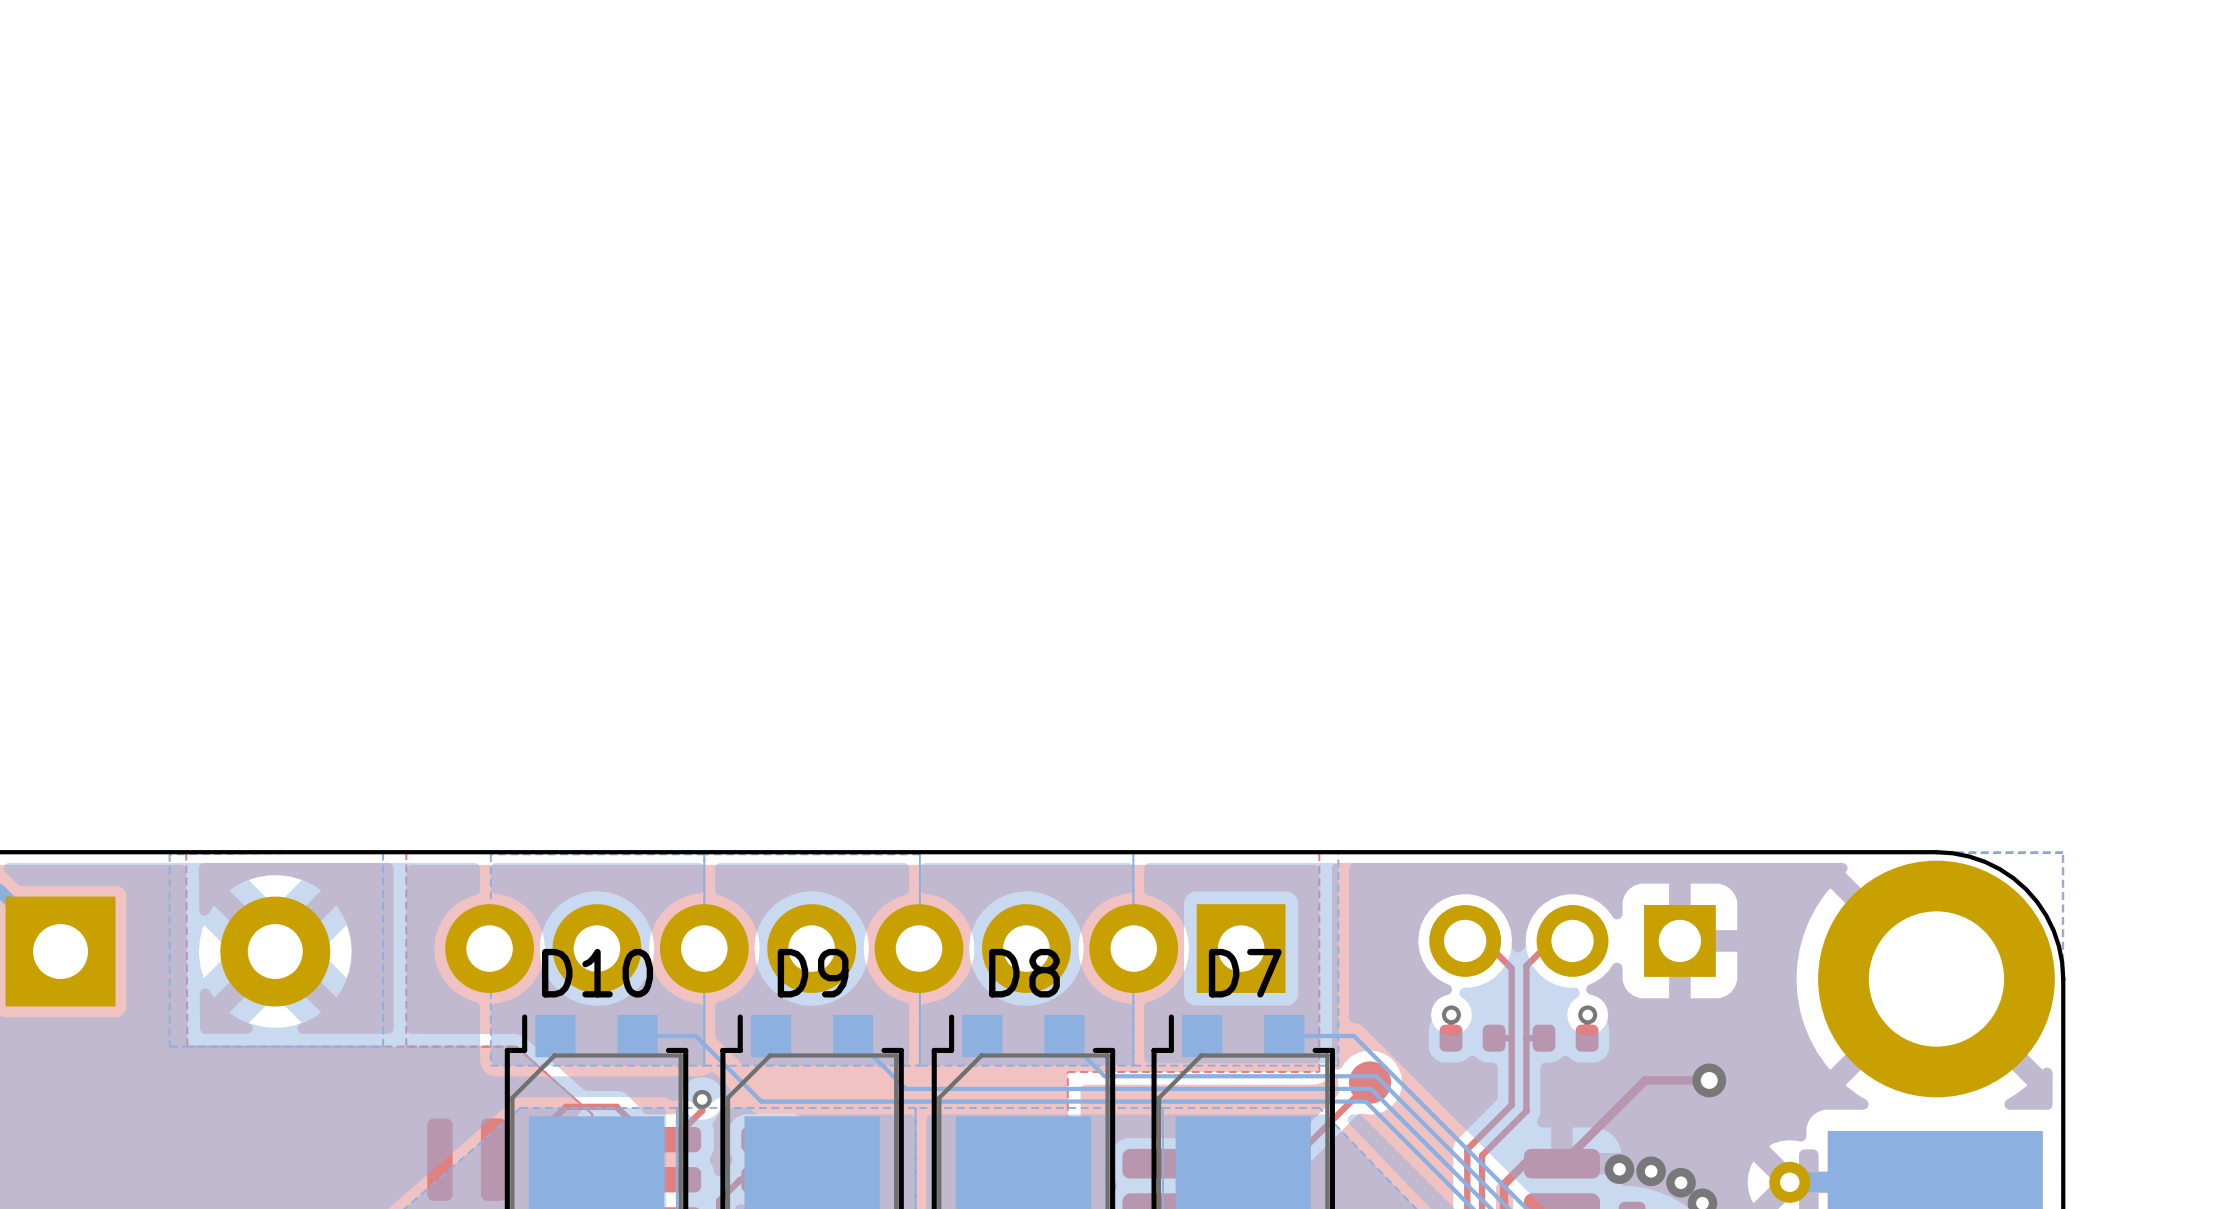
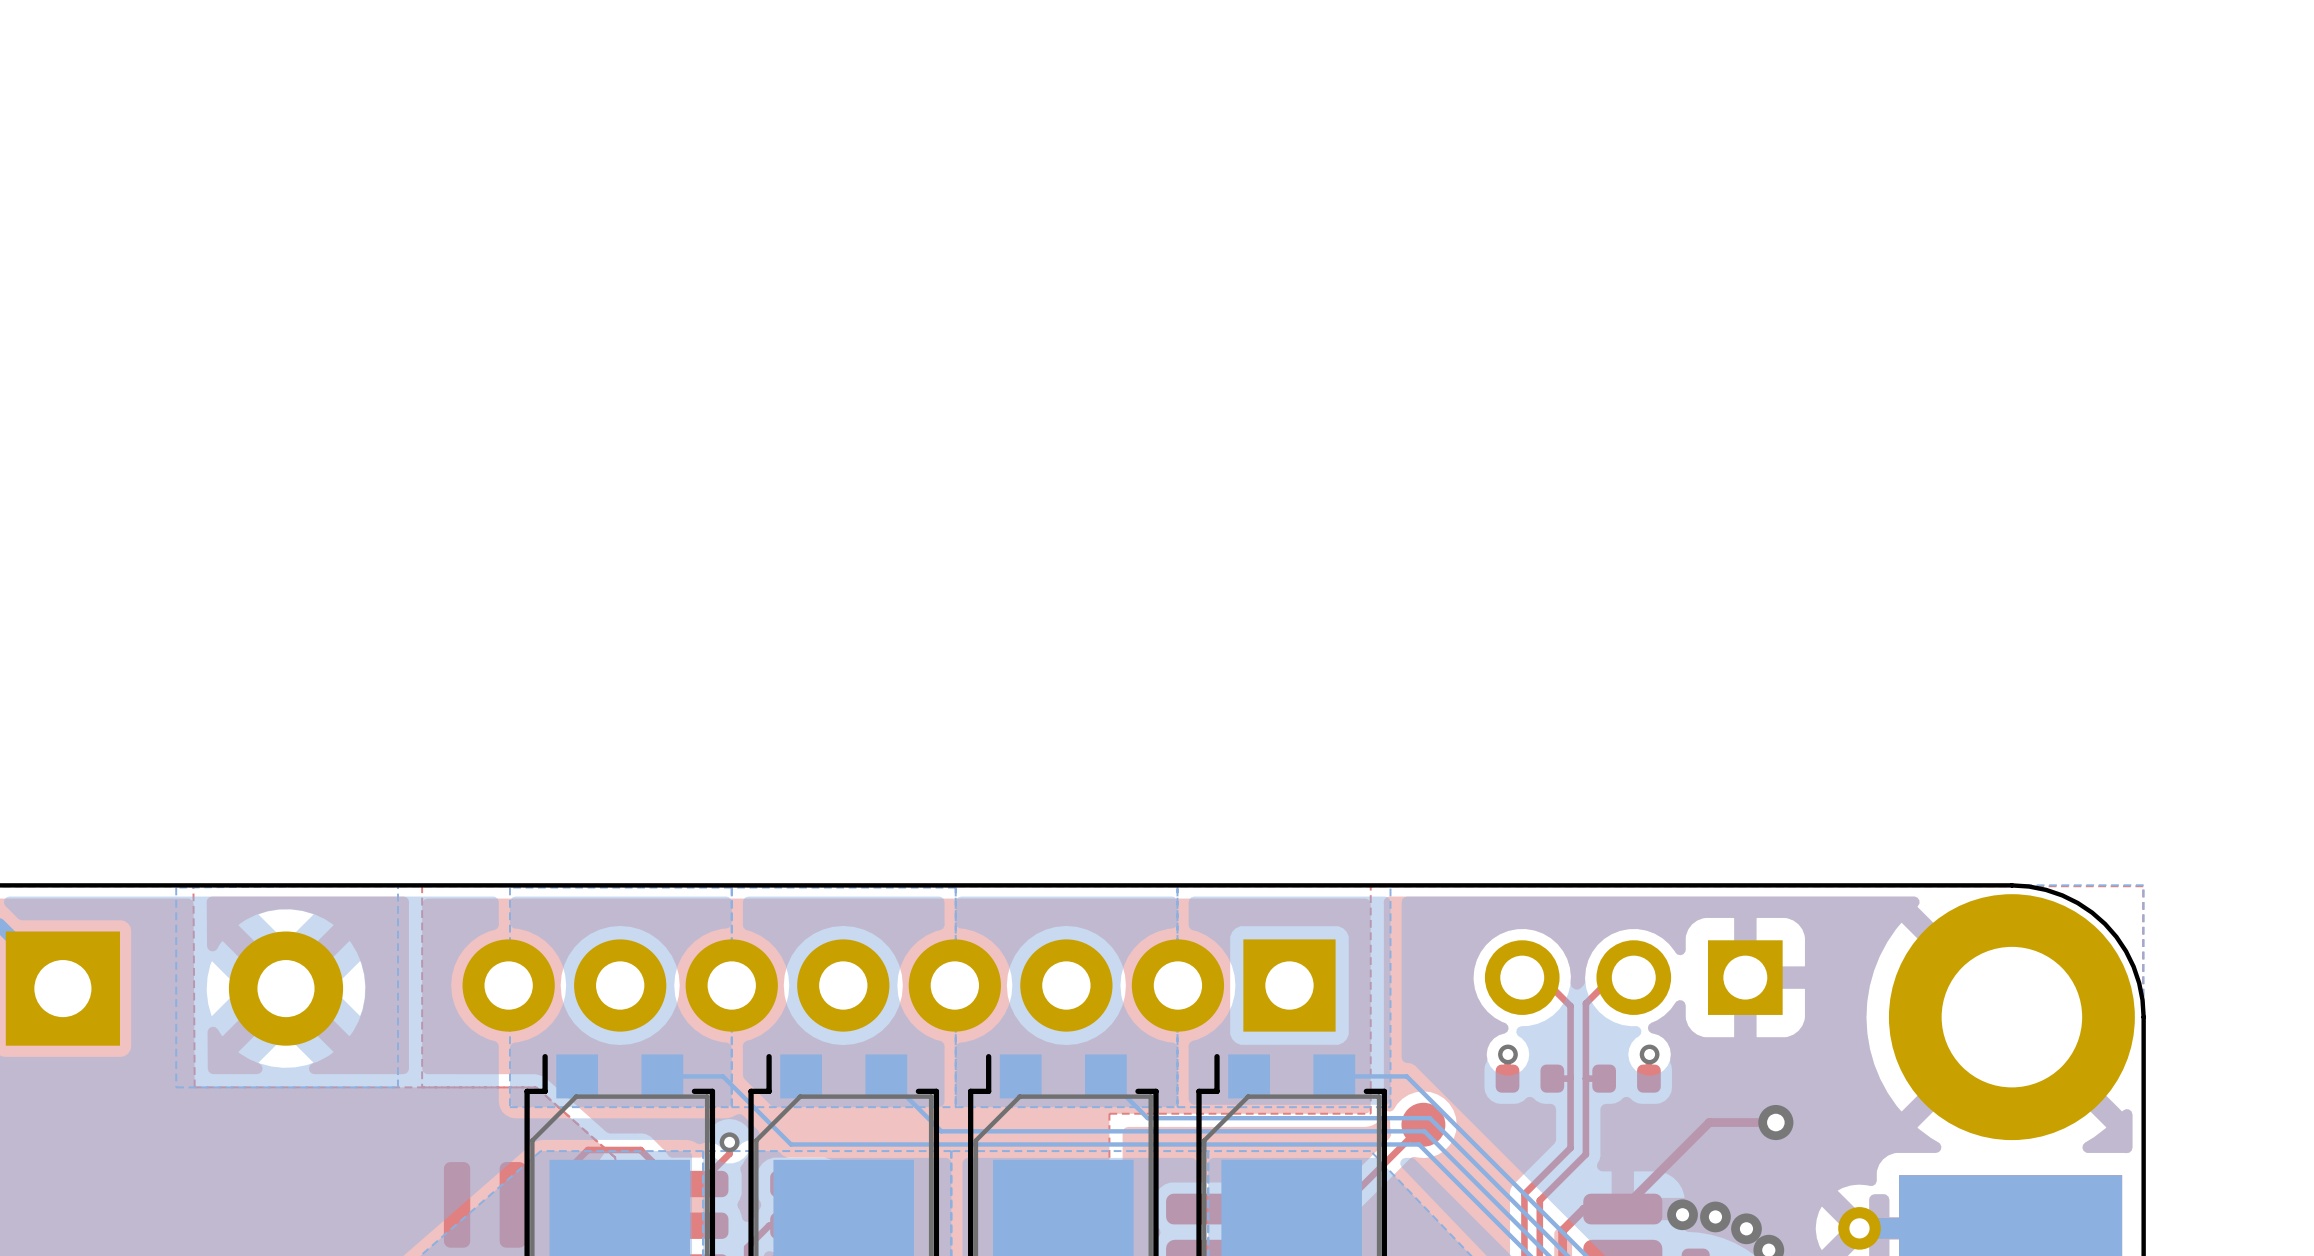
D10 name: D10 (597, 973) -> none
D9 name: D9 (813, 973) -> none
D8 name: D8 (1024, 973) -> none
D7 name: D7 (1245, 973) -> none

